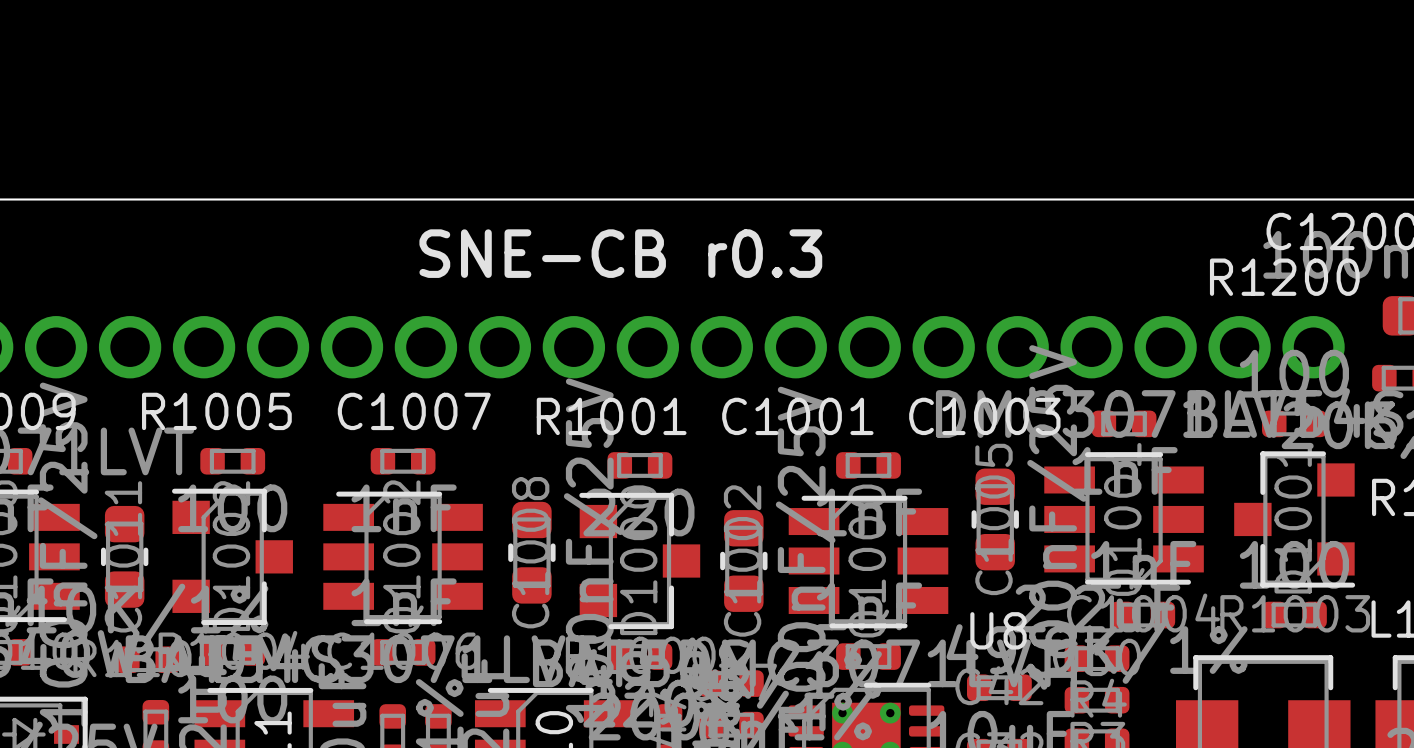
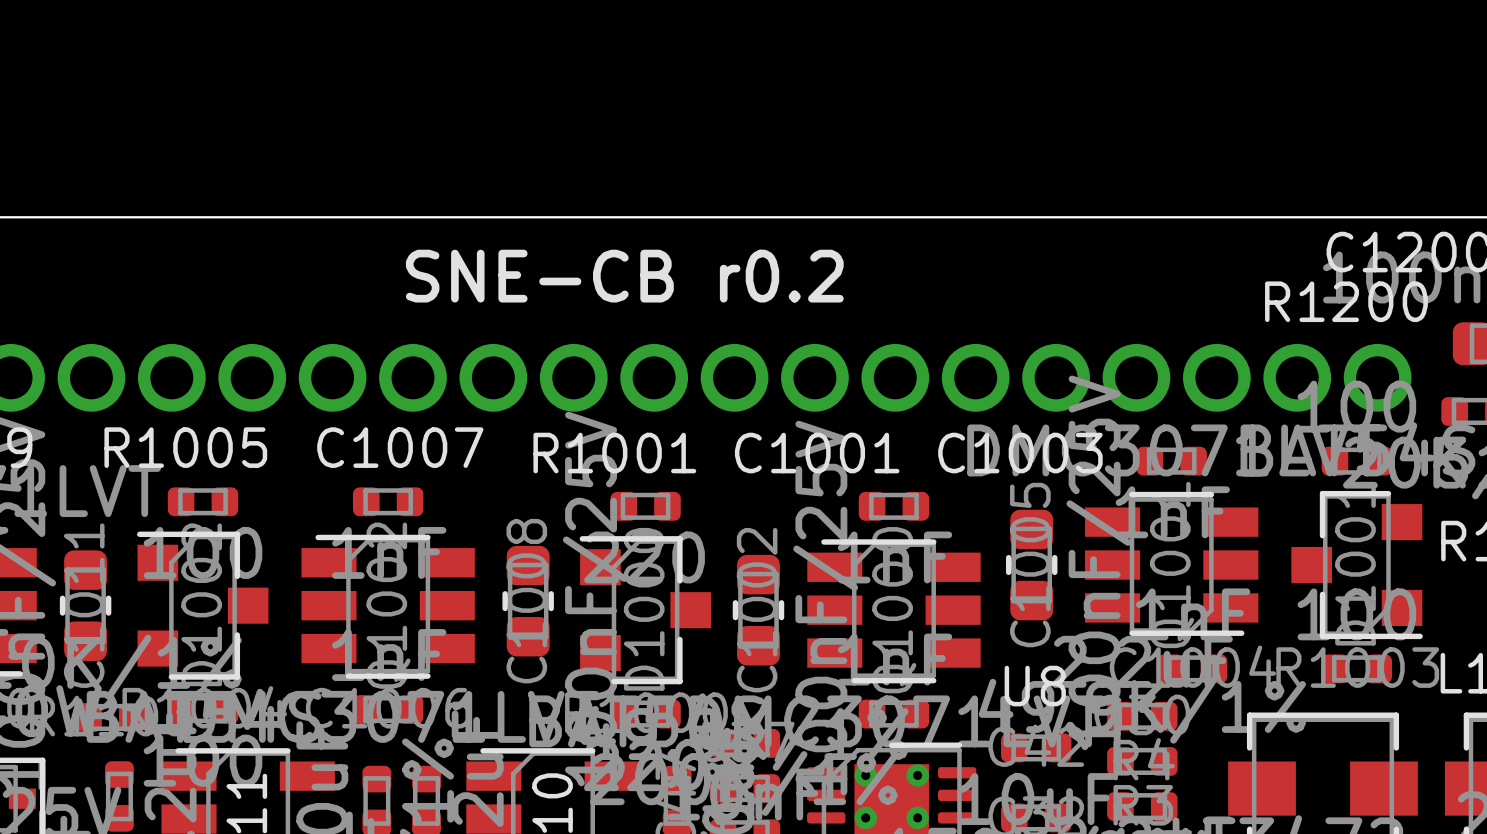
text: SNE-CB r0.3 (620, 253) -> SNE-CB r0.2 (624, 276)

